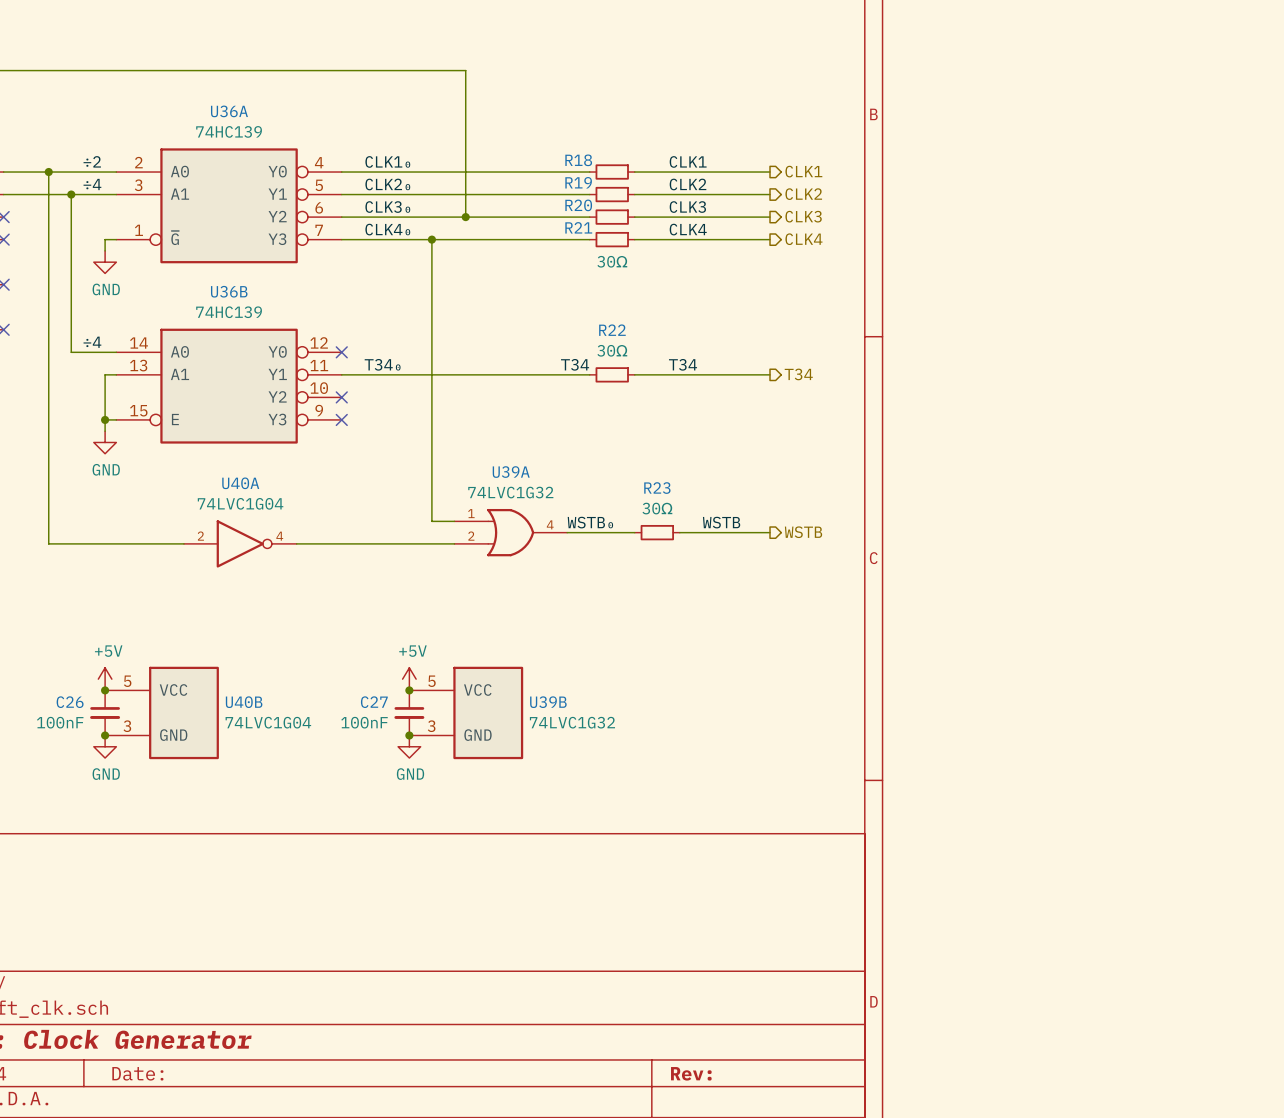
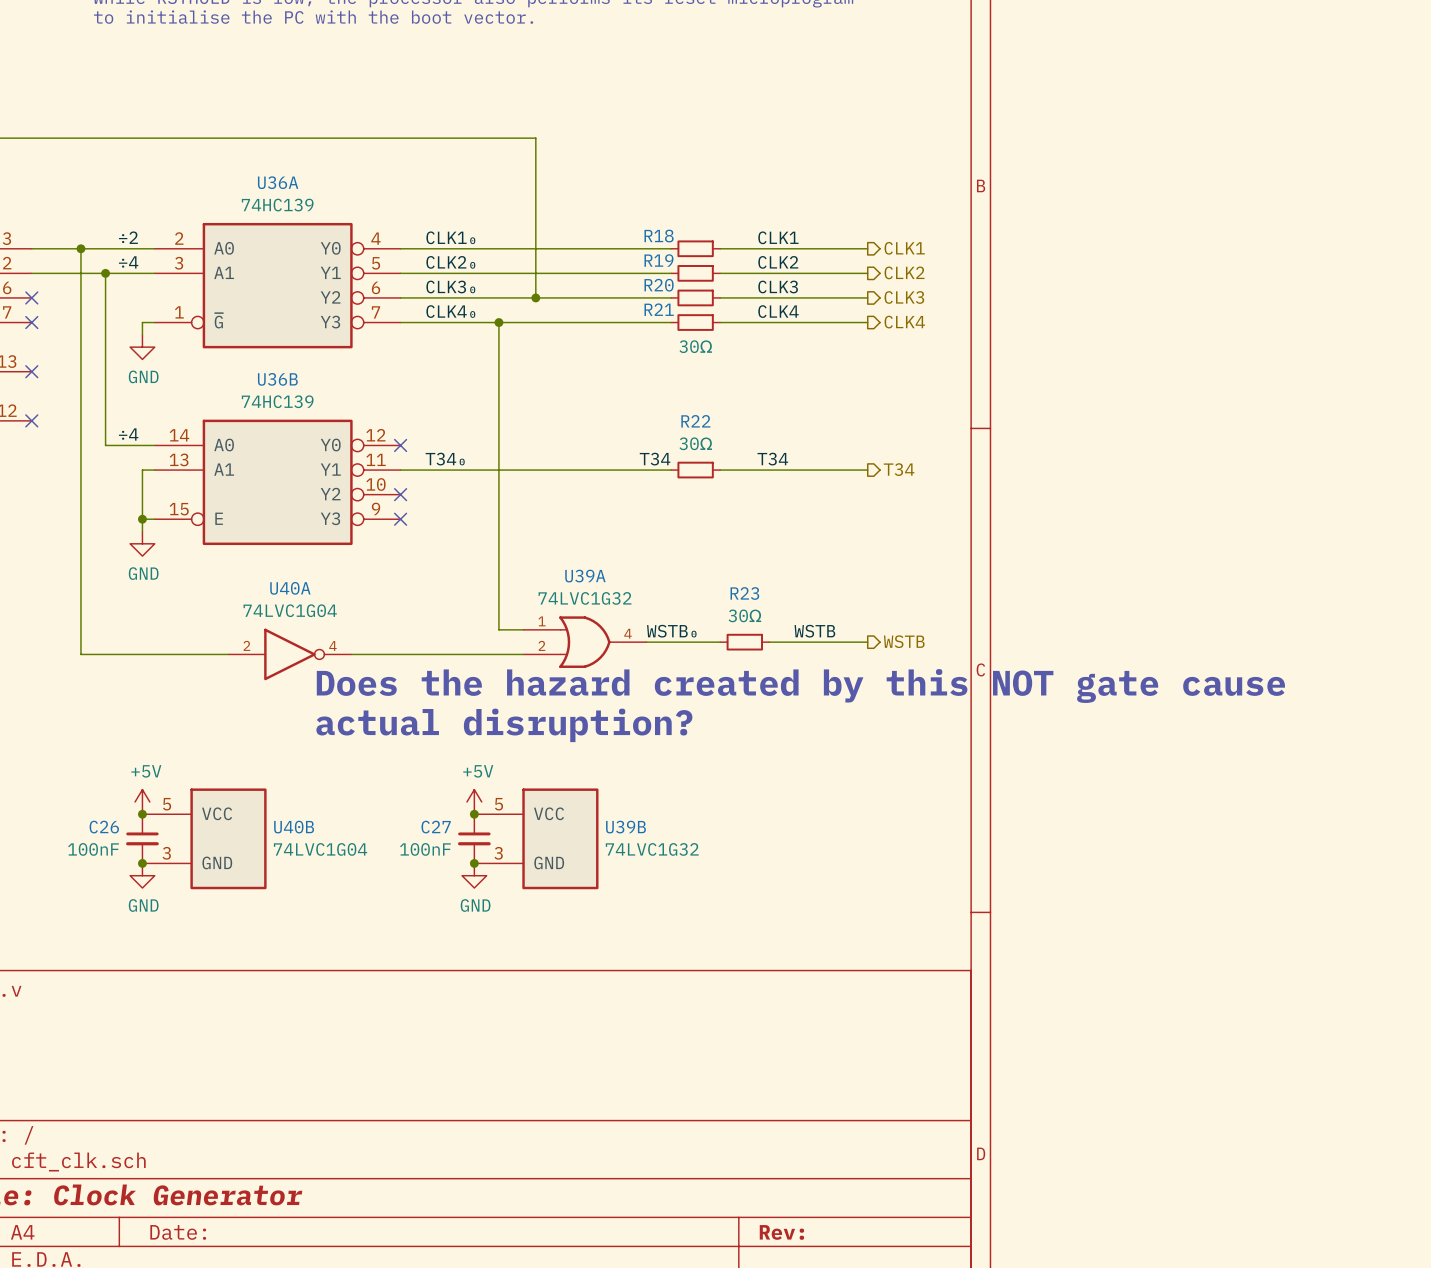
text: none -> Does the hazard created by this NOT gate cause (800, 685)
text: none -> actual disruption? (504, 725)

